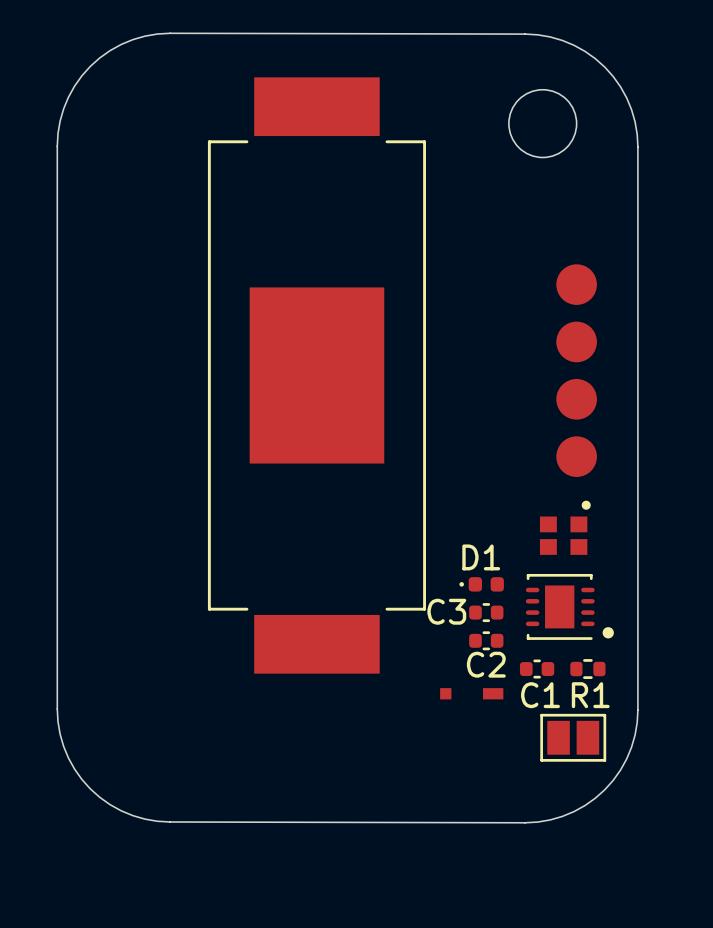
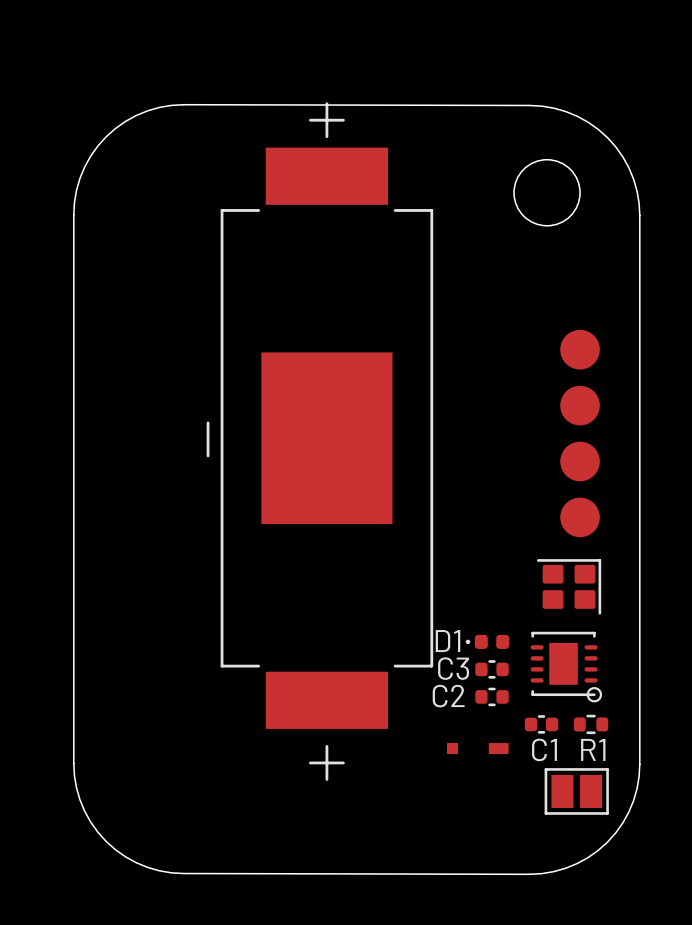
part footprint: [207, 77, 426, 674] -> [206, 102, 434, 781]
part footprint: [539, 500, 591, 555] -> [536, 559, 602, 615]
D1 name position: D1 (481, 557) -> D1 (448, 641)
drawing: [602, 627, 614, 639] -> none
drawing: none -> [586, 687, 603, 703]
C2 name position: C2 (486, 664) -> C2 (448, 696)

